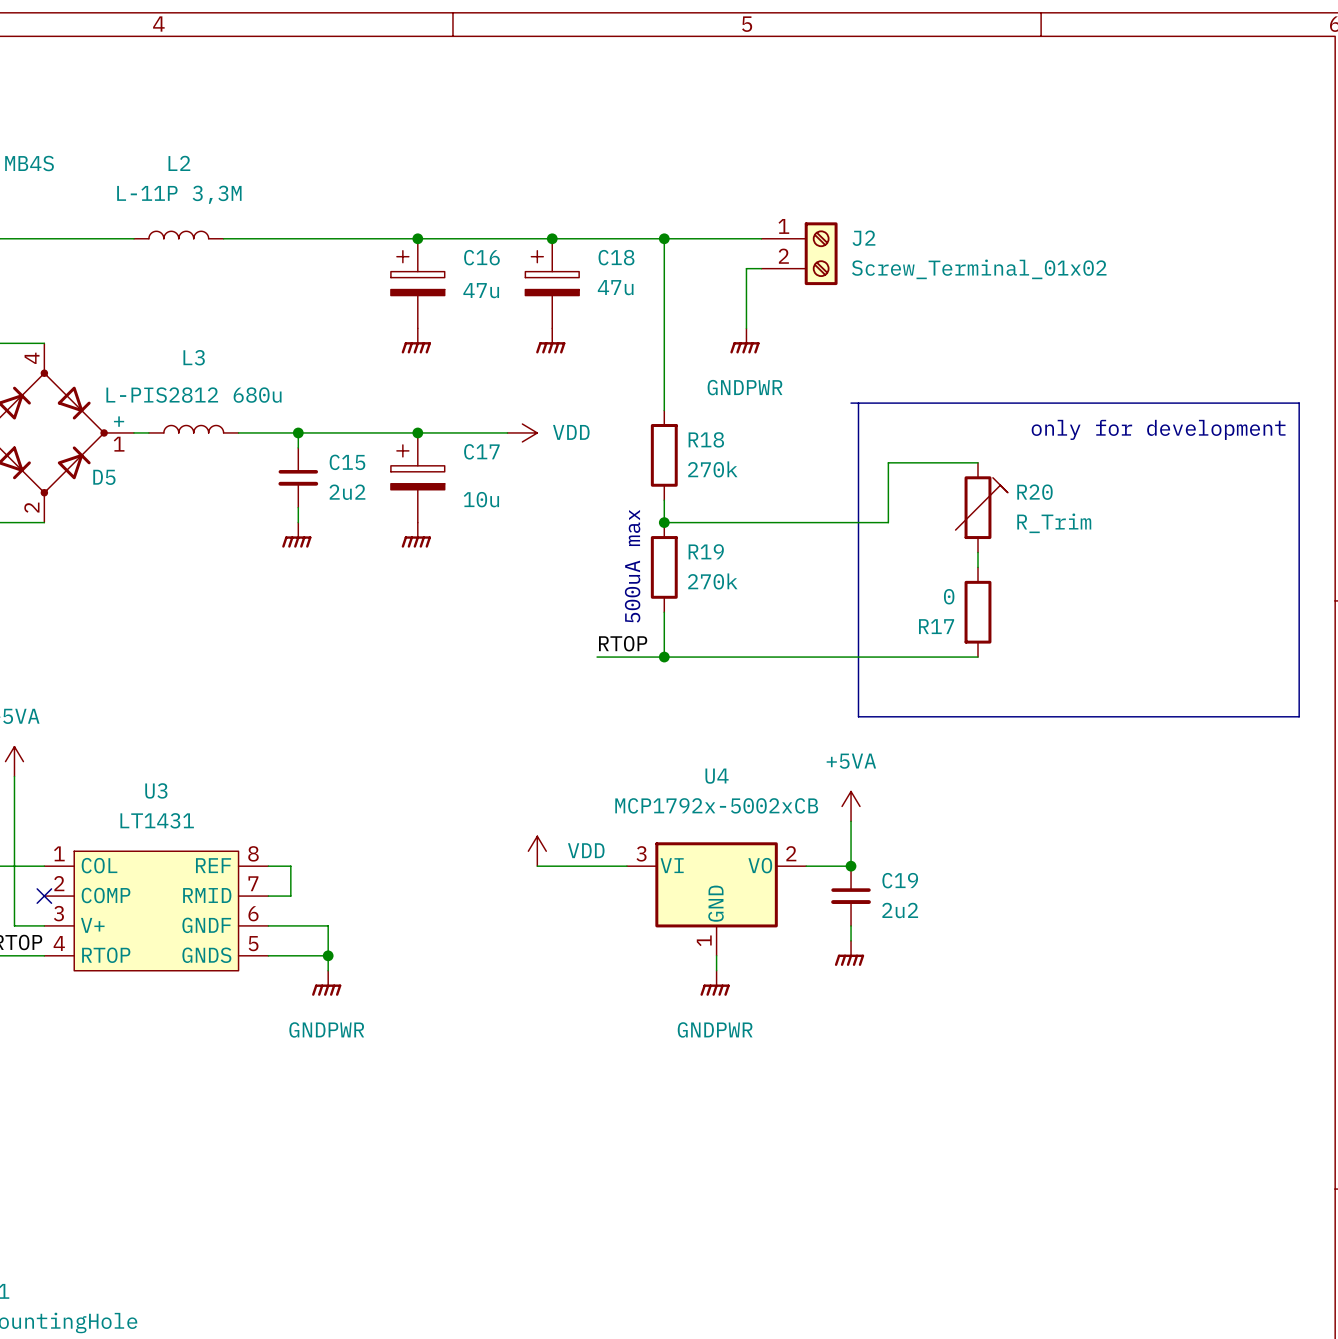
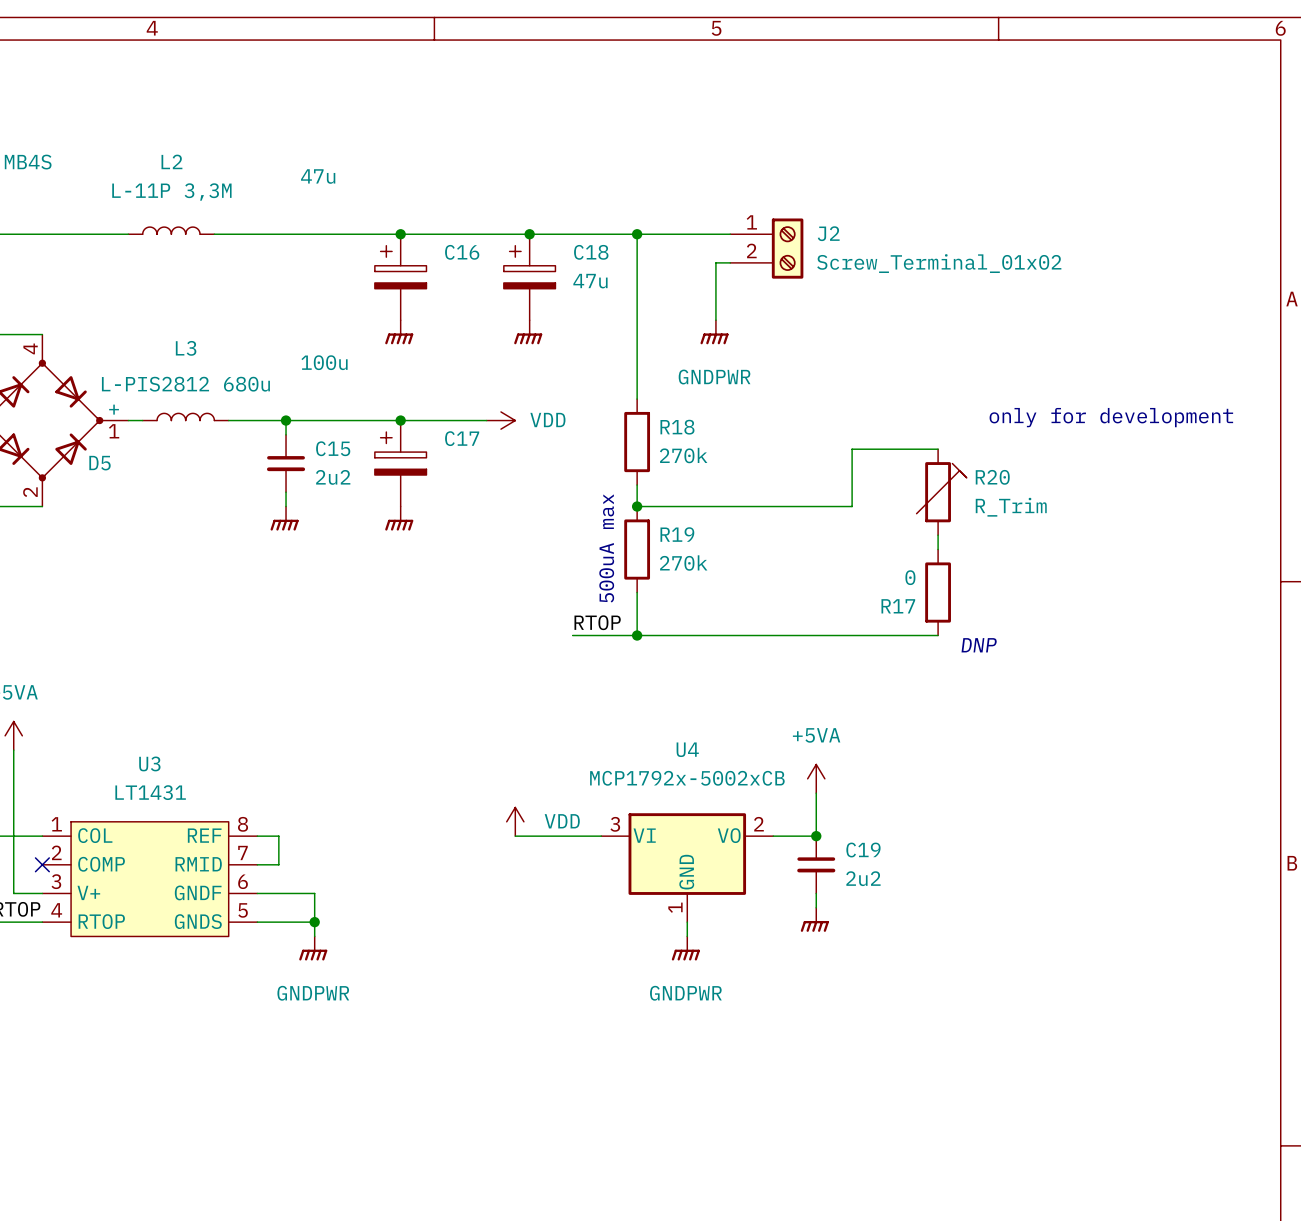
C16 value position: 47u (481, 290) -> 47u (318, 176)
line: (851, 403) (1299, 403) (1299, 716) (858, 716) (858, 403) -> none
C17 value: 10u (481, 499) -> 100u (324, 362)
text: none -> DNP (979, 645)

